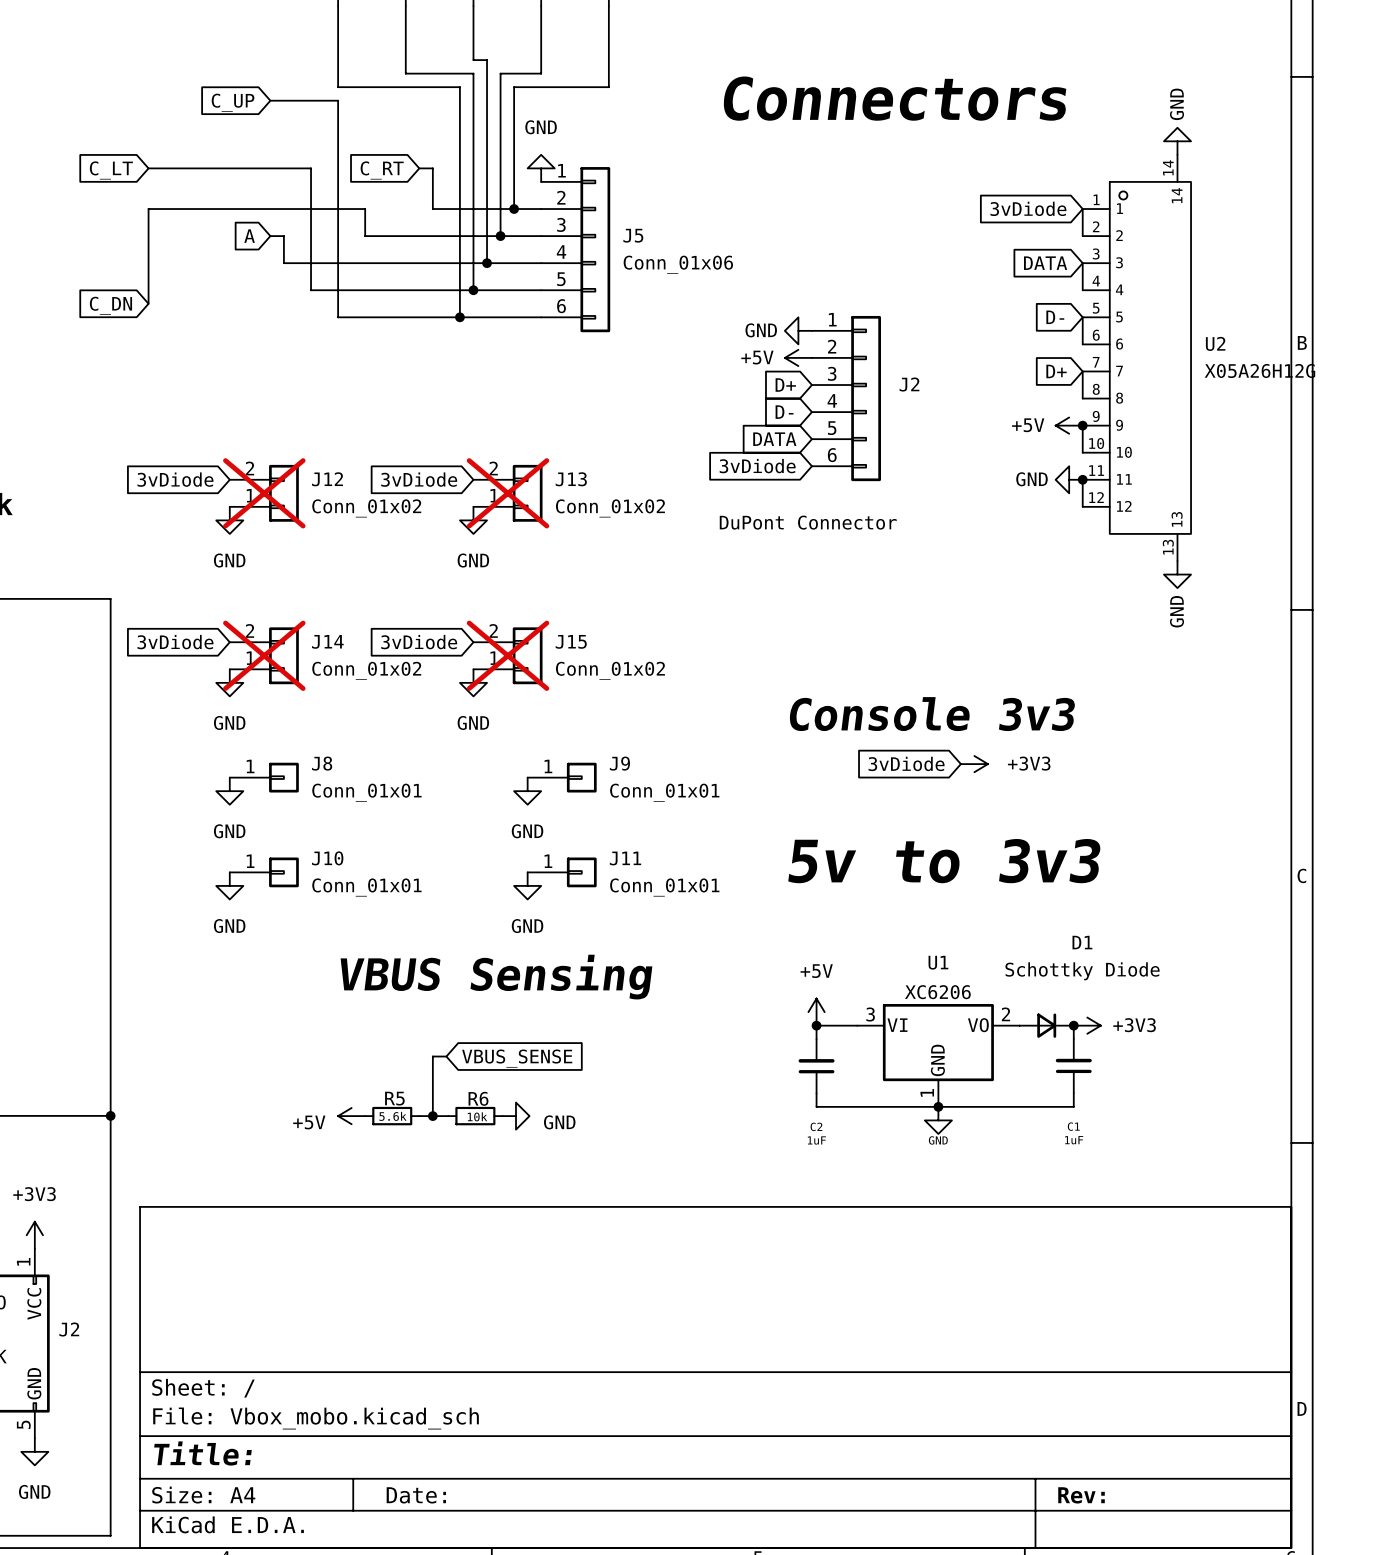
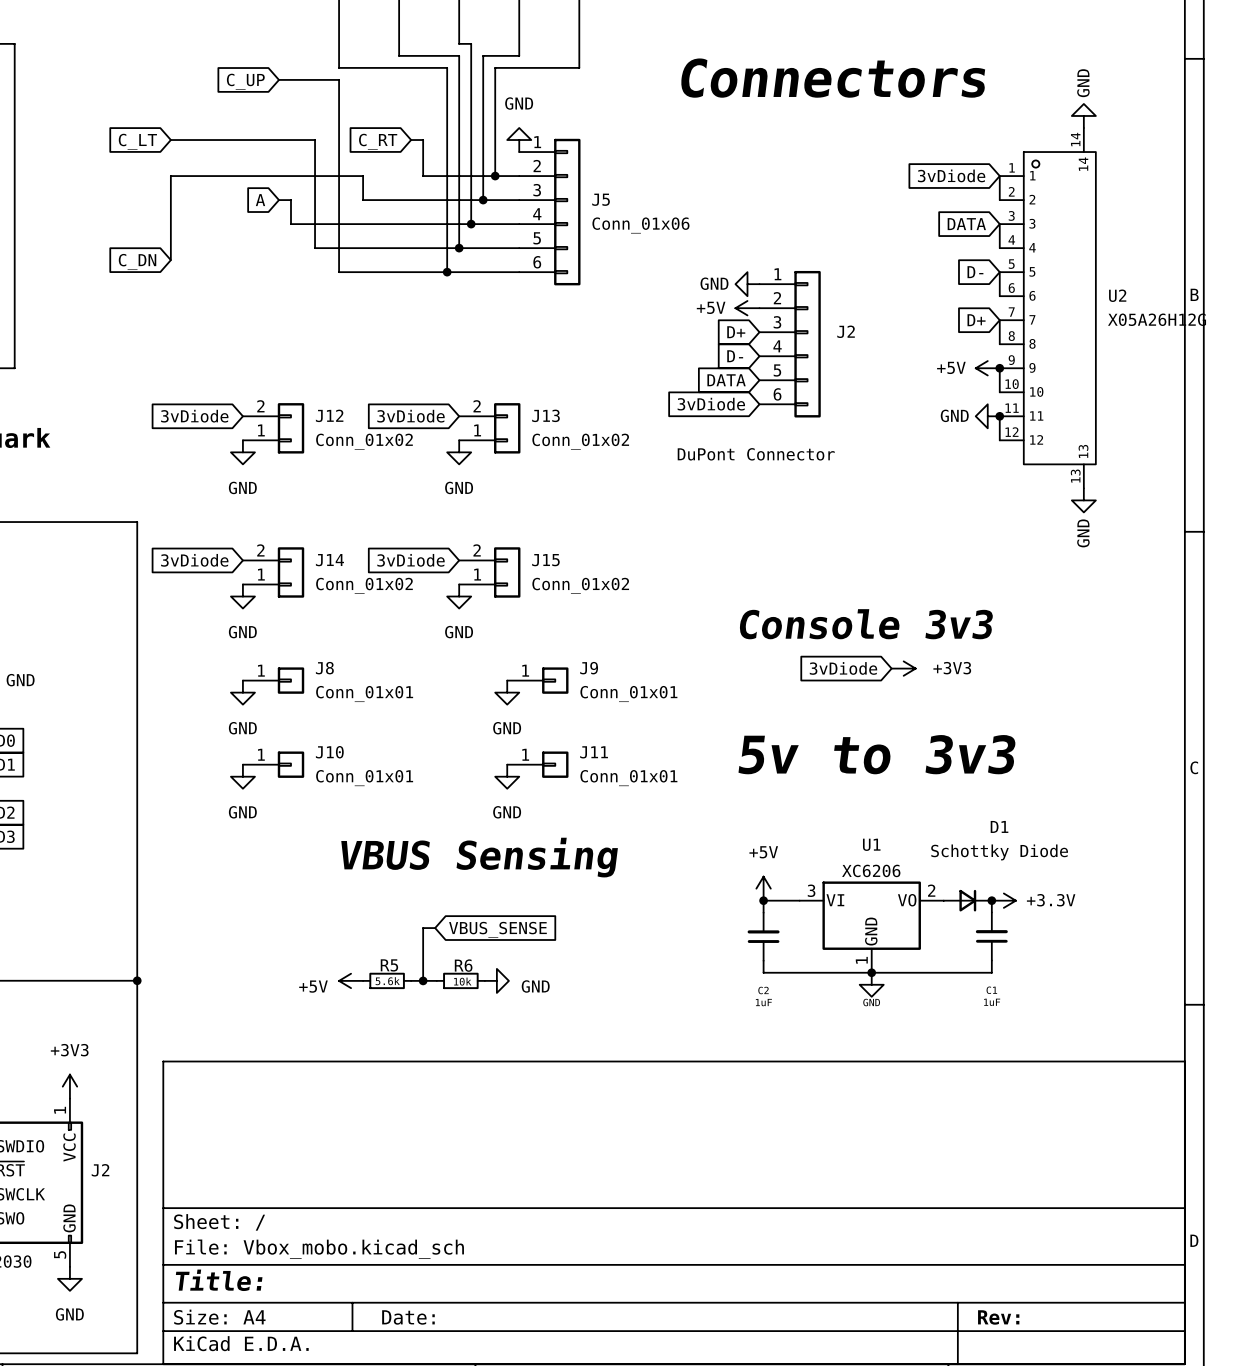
J12 do-not-place cross: (264, 493) -> none
J13 do-not-place cross: (508, 493) -> none
J14 do-not-place cross: (264, 655) -> none
J15 do-not-place cross: (508, 655) -> none
power symbol: +3V3 (1087, 1025) -> +3.3V (1003, 900)

